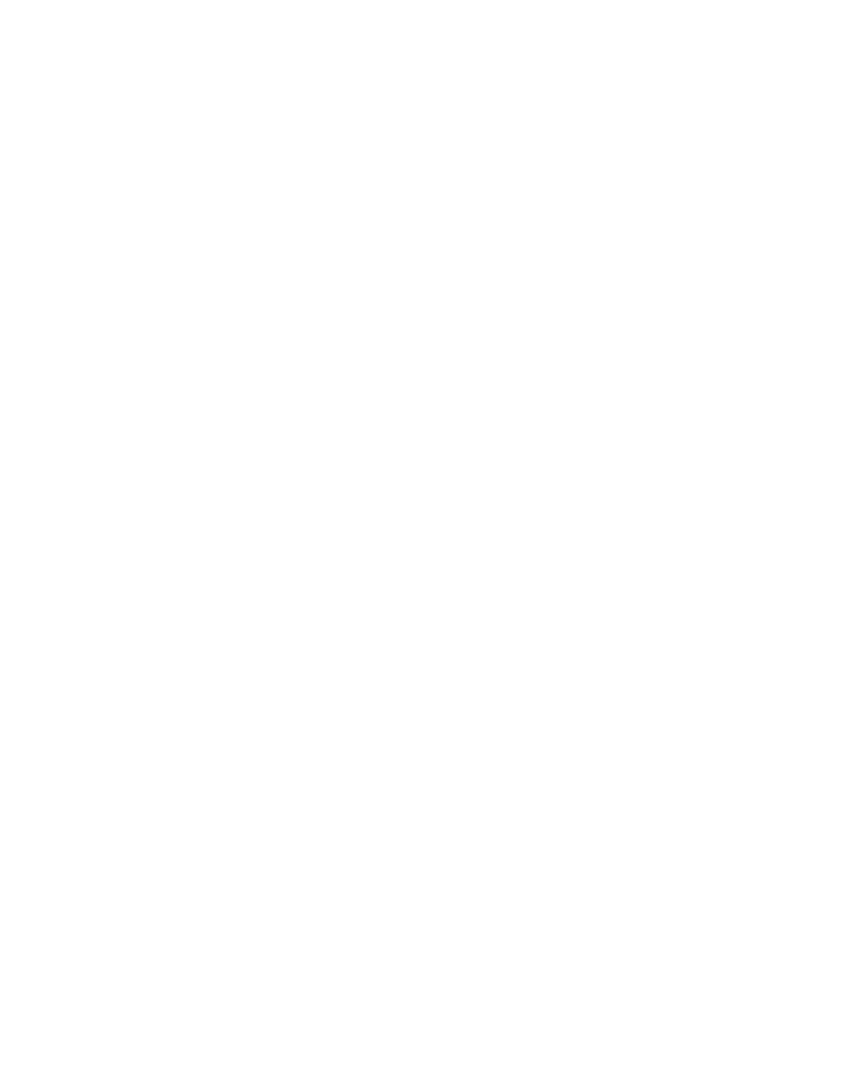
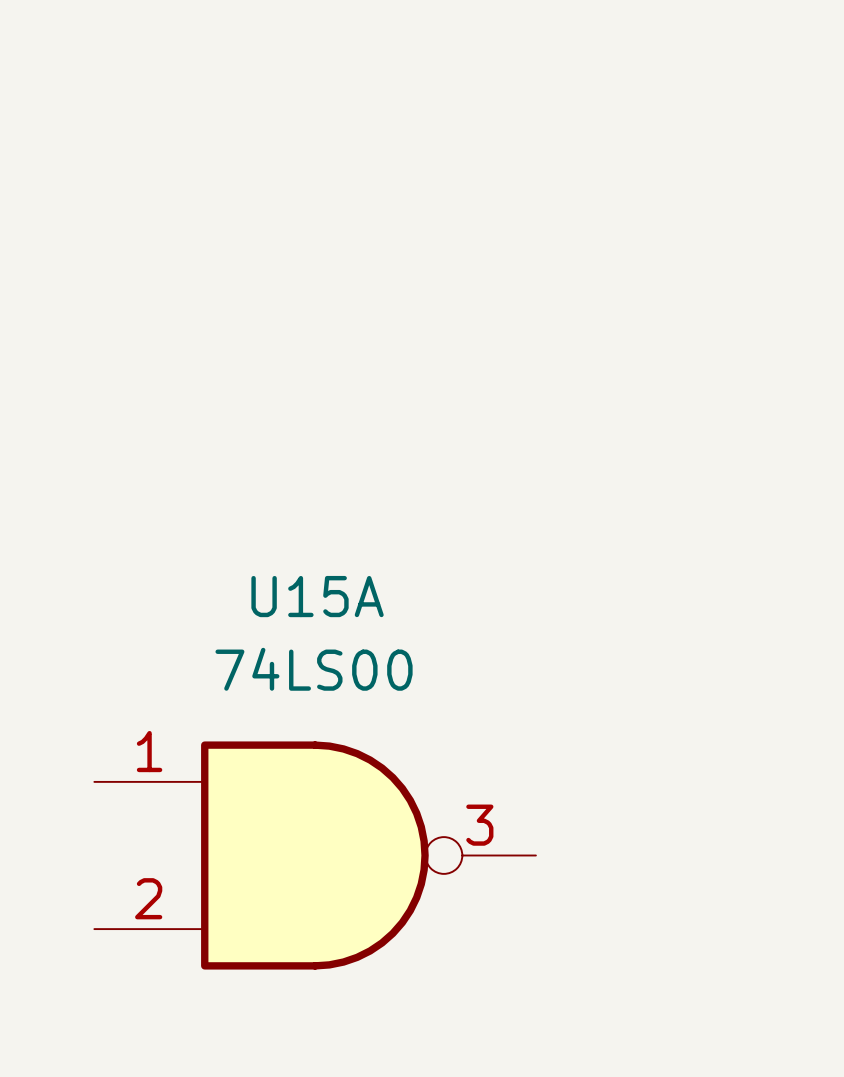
U15A: none -> 74LS00 (315, 855)

